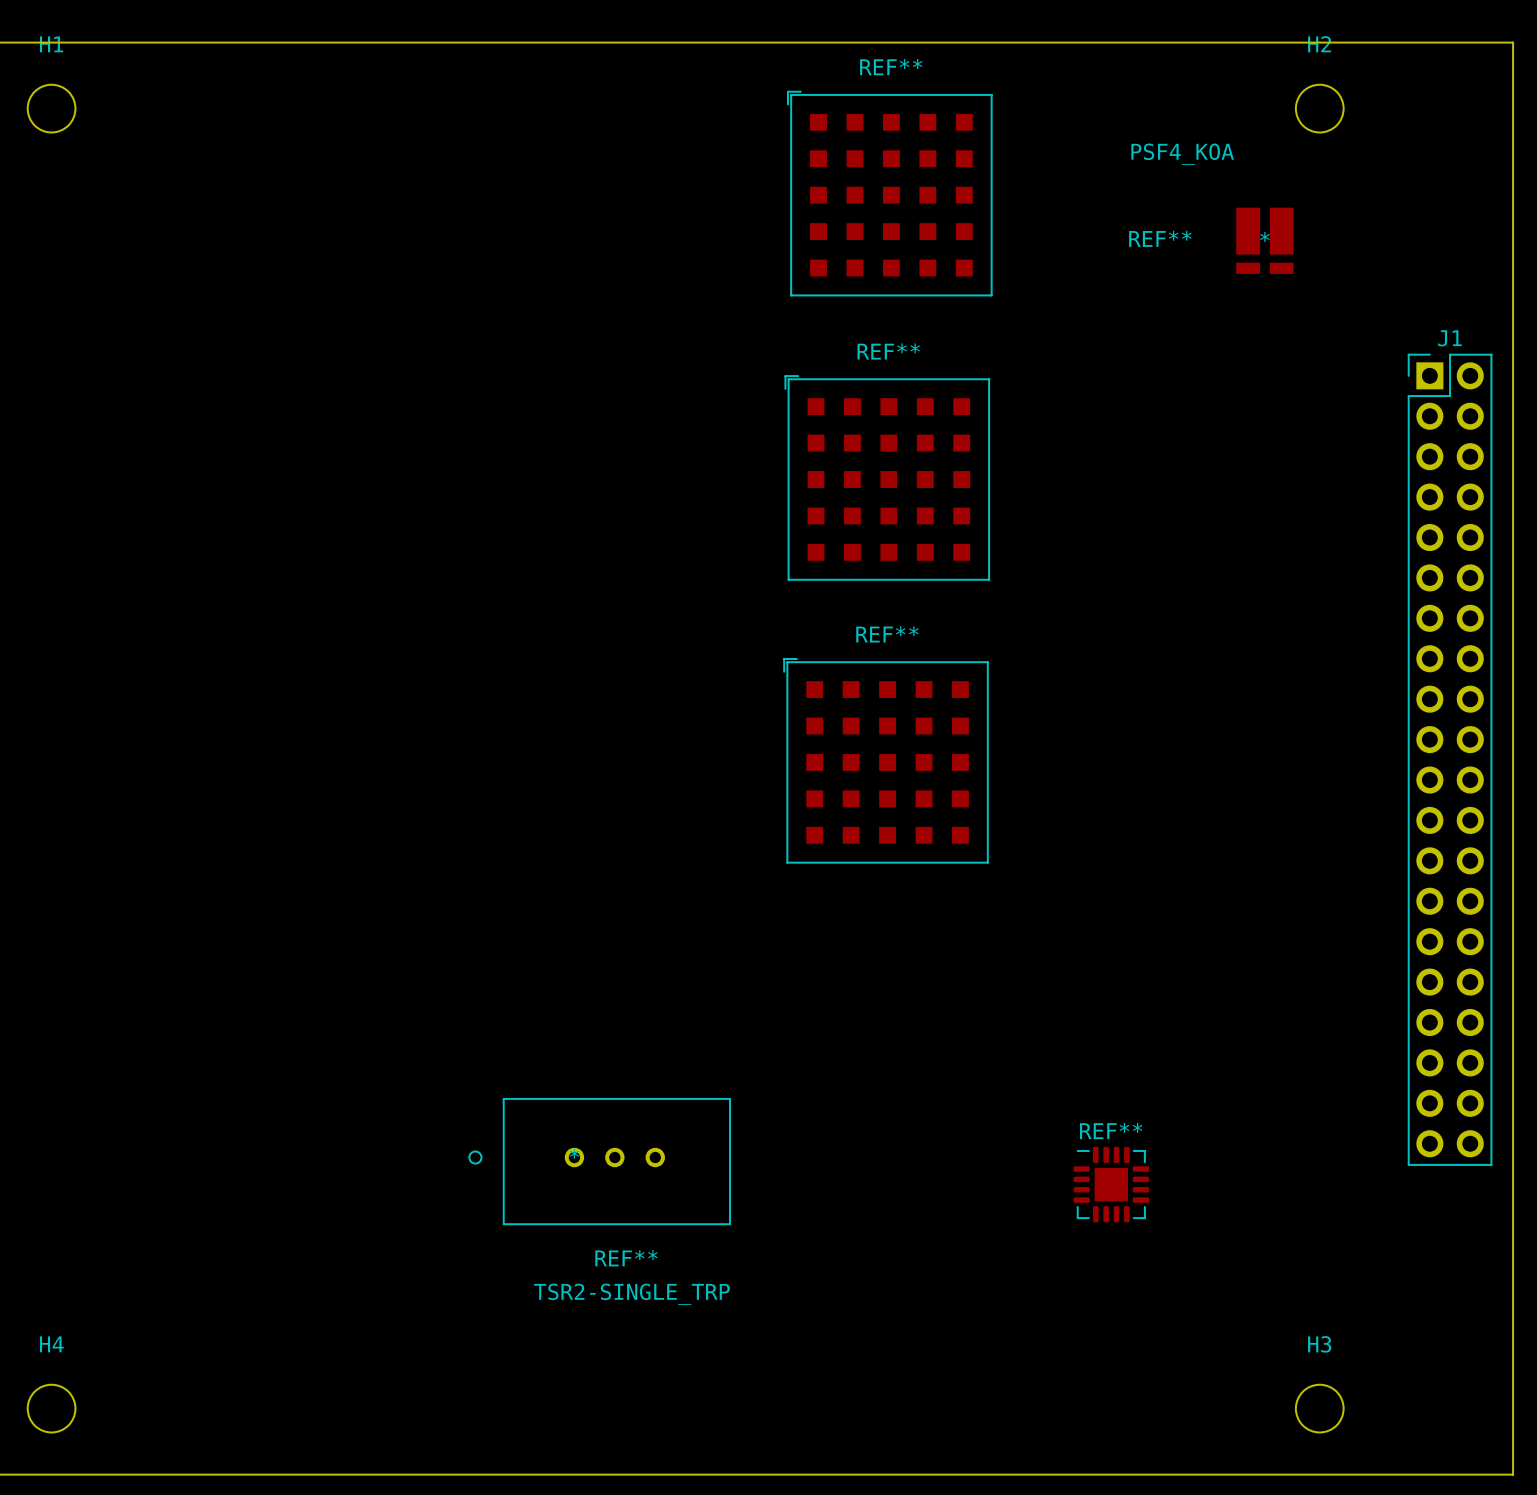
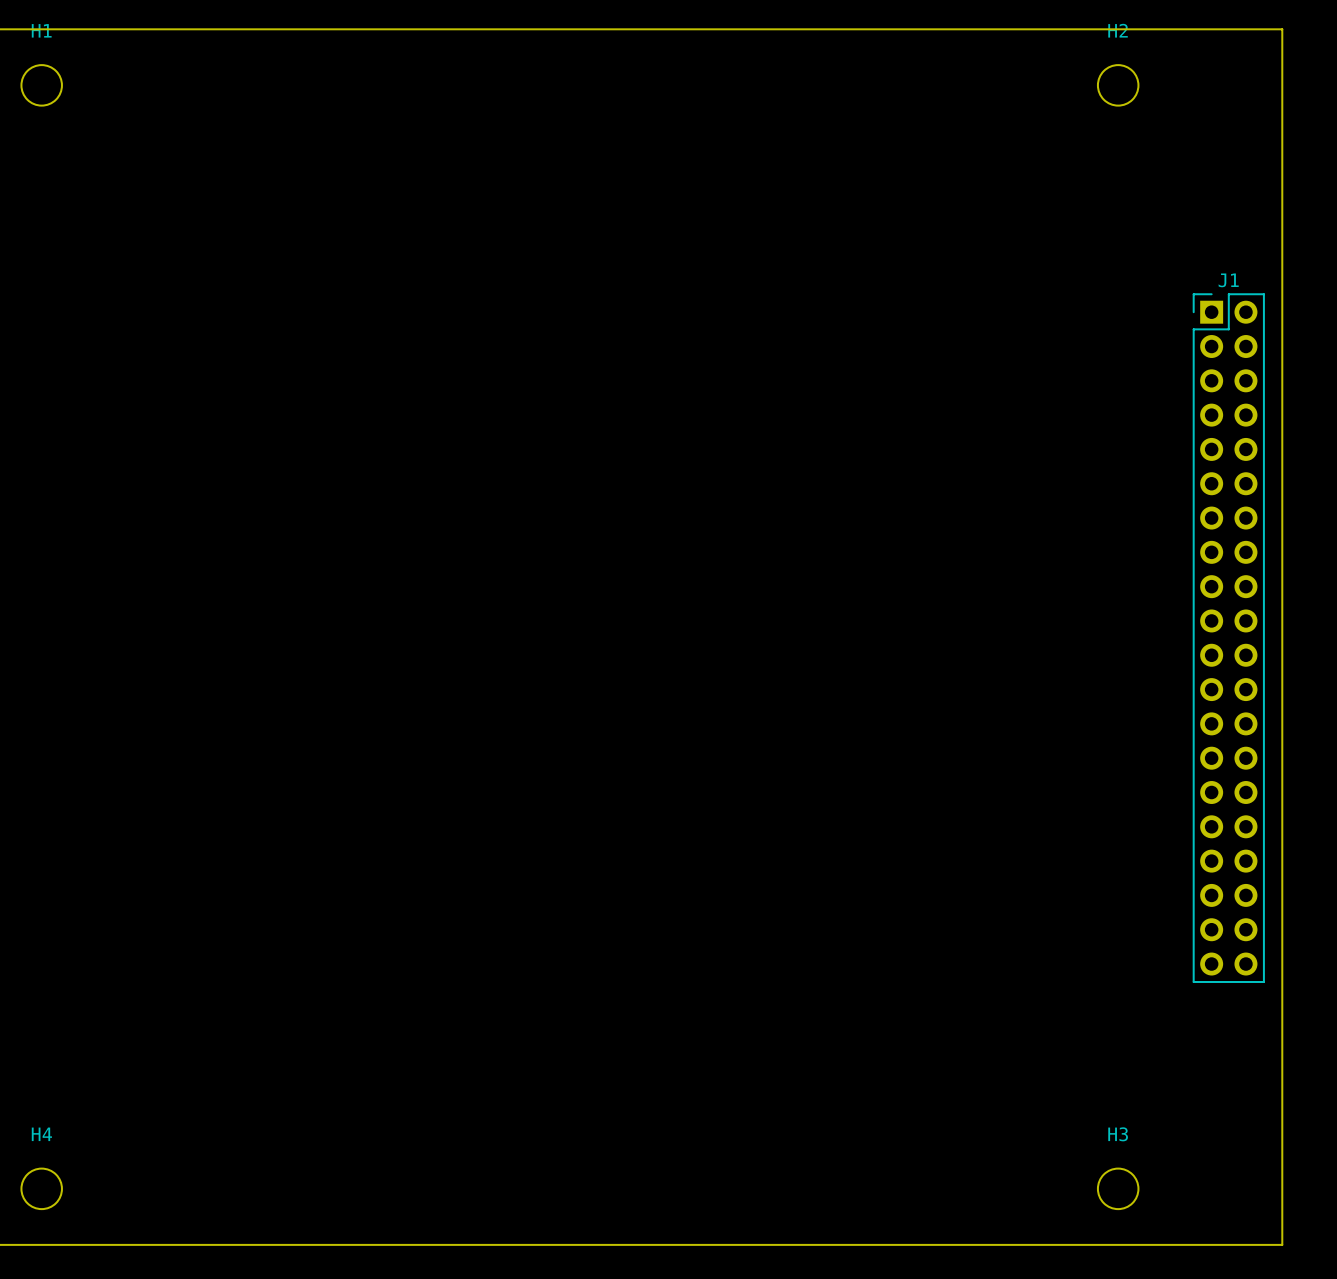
REF**: (889, 193) -> none
REF**: PSF4_KOA (1264, 240) -> none
REF**: (887, 477) -> none
REF**: (885, 760) -> none
REF**: TSR2-SINGLE_TRP (599, 1161) -> none
REF**: (1111, 1184) -> none

